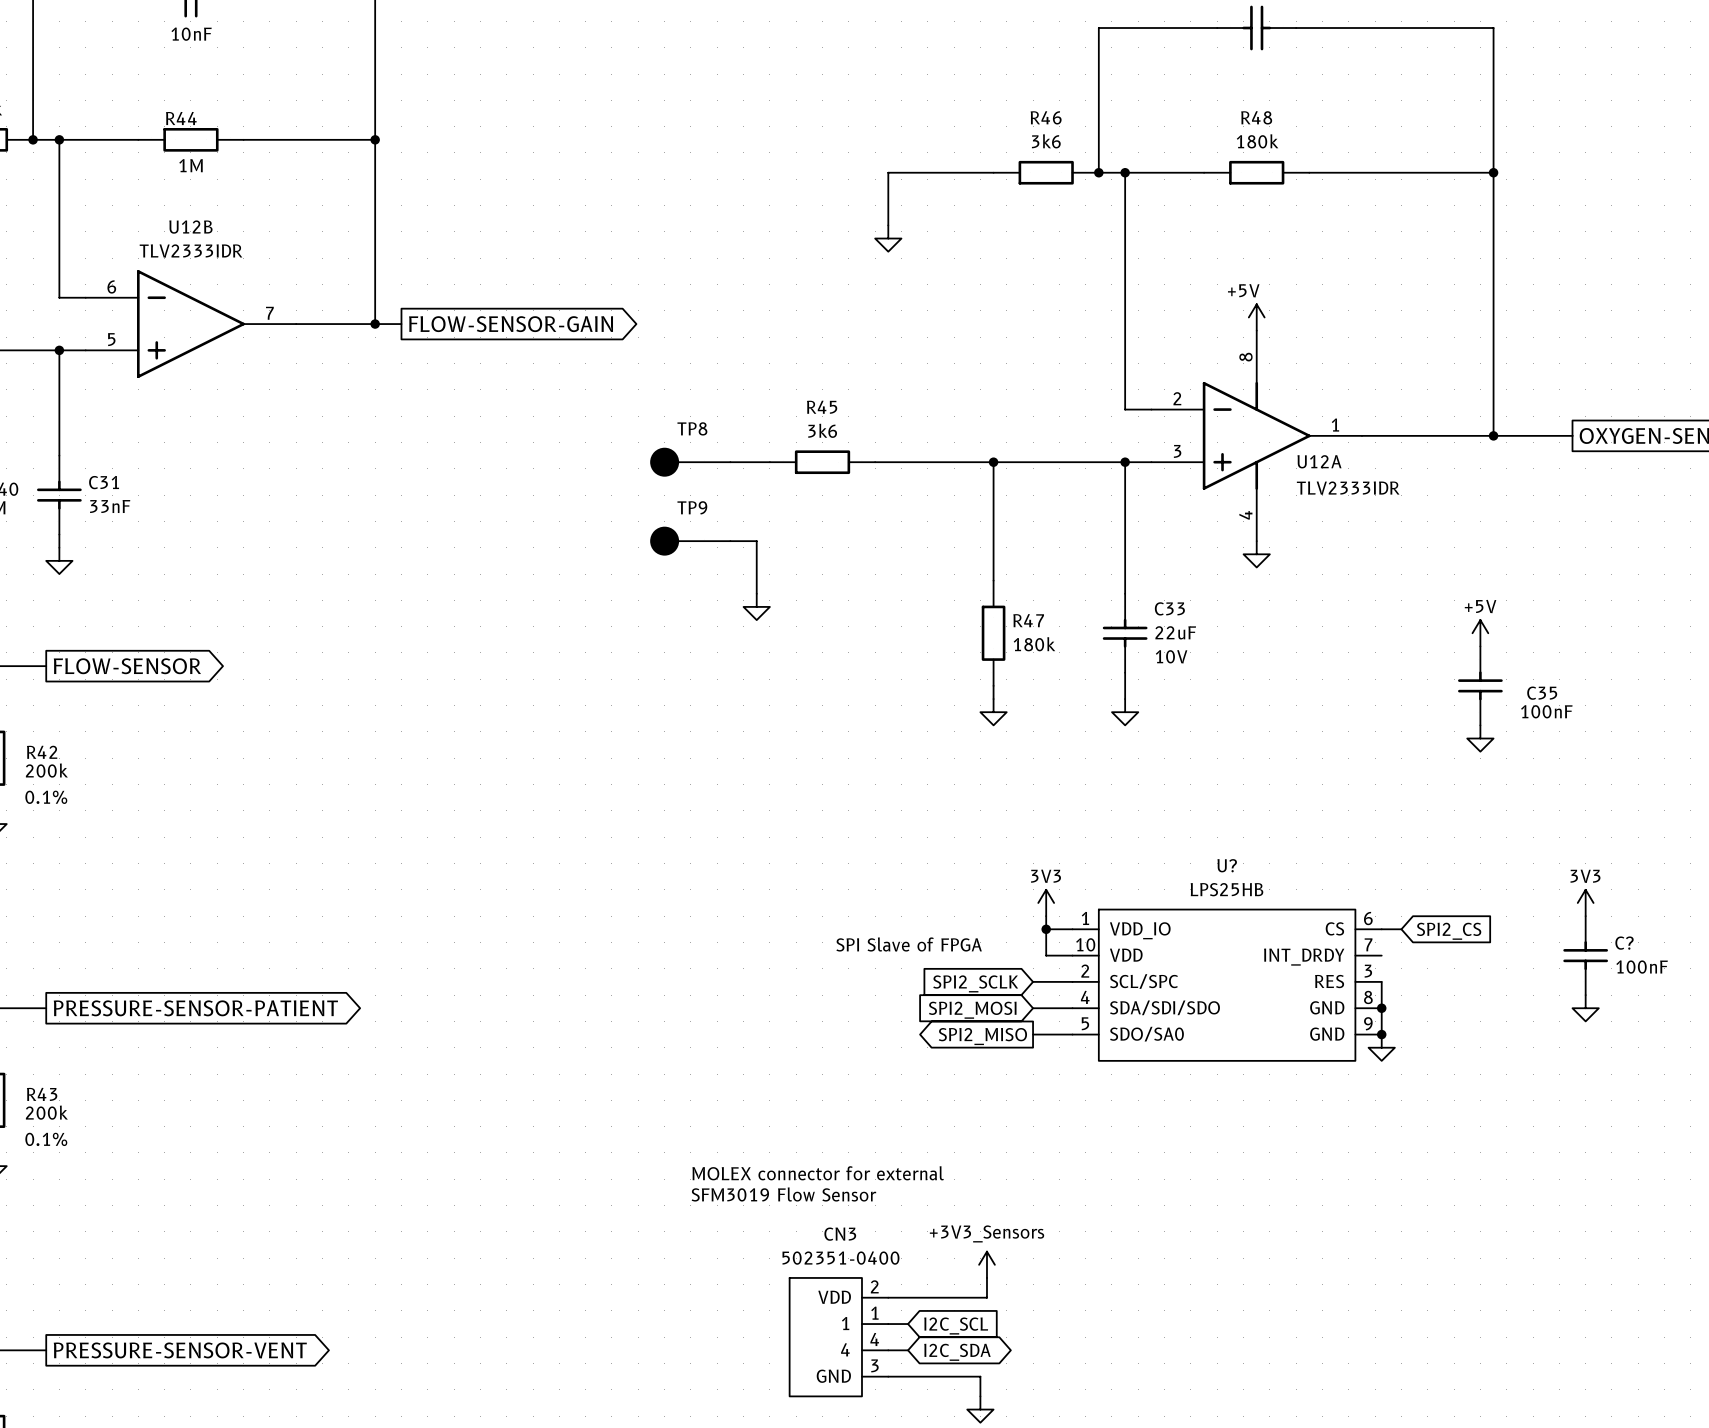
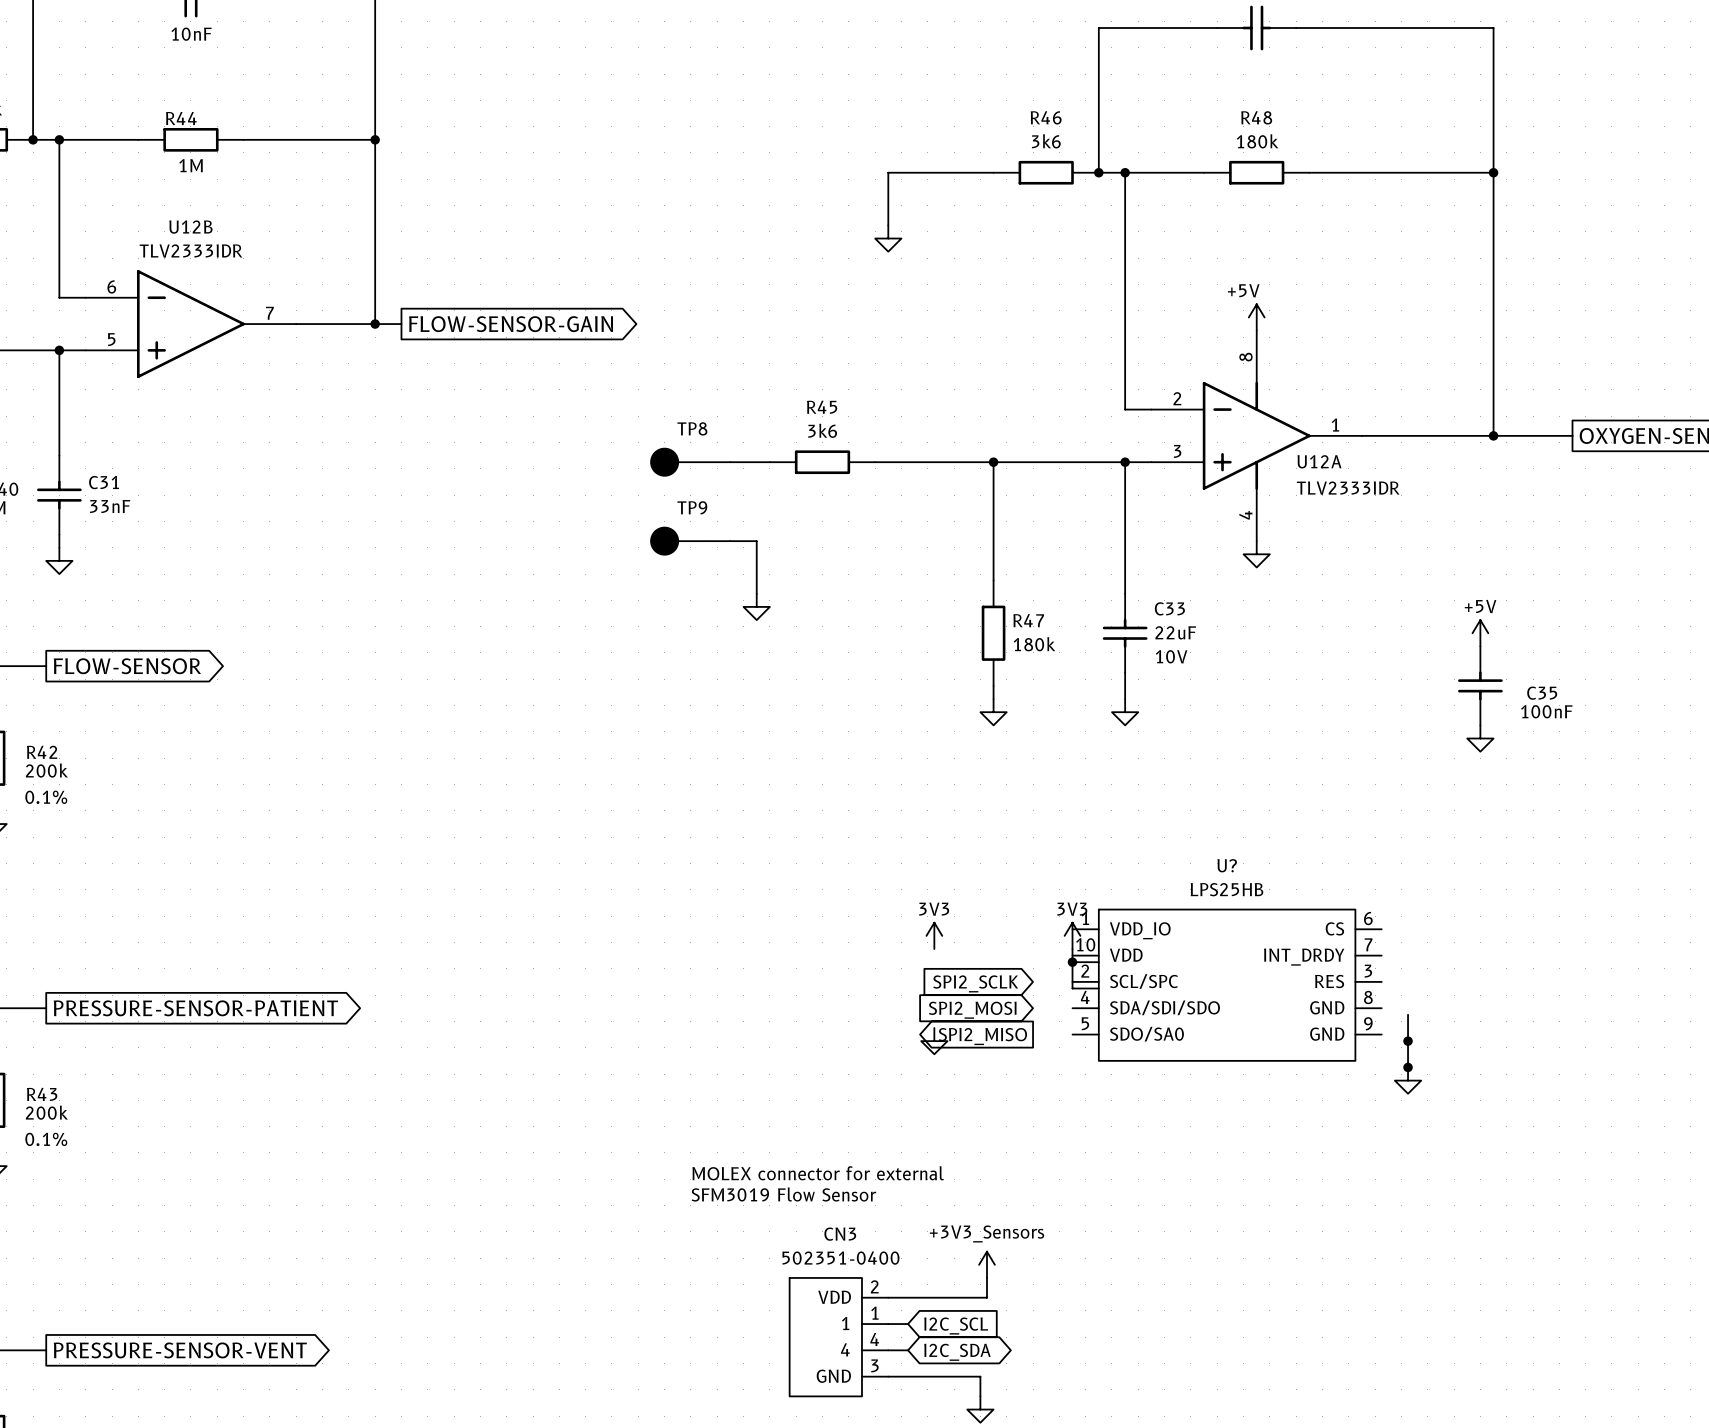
power symbol position: 3V3 (1046, 902) -> 3V3 (1072, 935)
power symbol: 3V3 (1585, 902) -> none
wire: (1046, 916) (1046, 955) (1072, 955) -> (1072, 949) (1072, 988) (1098, 988)
wire: (1046, 929) (1072, 929) -> (1072, 962) (1098, 962)
junction position: (1046, 929) -> (1072, 962)
wire: (1381, 929) (1401, 929) -> none
global label: SPI2_CS (1449, 931) -> none
power symbol: none -> 3V3 (934, 935)
text: SPI Slave of FPGA (909, 944) -> none
C?: (1585, 955) -> none
wire: (1033, 981) (1072, 981) -> none
wire: (1381, 981) (1381, 1034) -> (1408, 1014) (1408, 1067)
wire: (1033, 1008) (1072, 1008) -> none
junction: (1381, 1008) -> none
power symbol: (1585, 1008) -> none
wire: (1033, 1034) (1072, 1034) -> none
junction: (1381, 1034) -> none
power symbol: none -> (934, 1041)
junction: none -> (1408, 1041)
power symbol position: (1381, 1047) -> (1408, 1080)
junction: none -> (1408, 1067)

